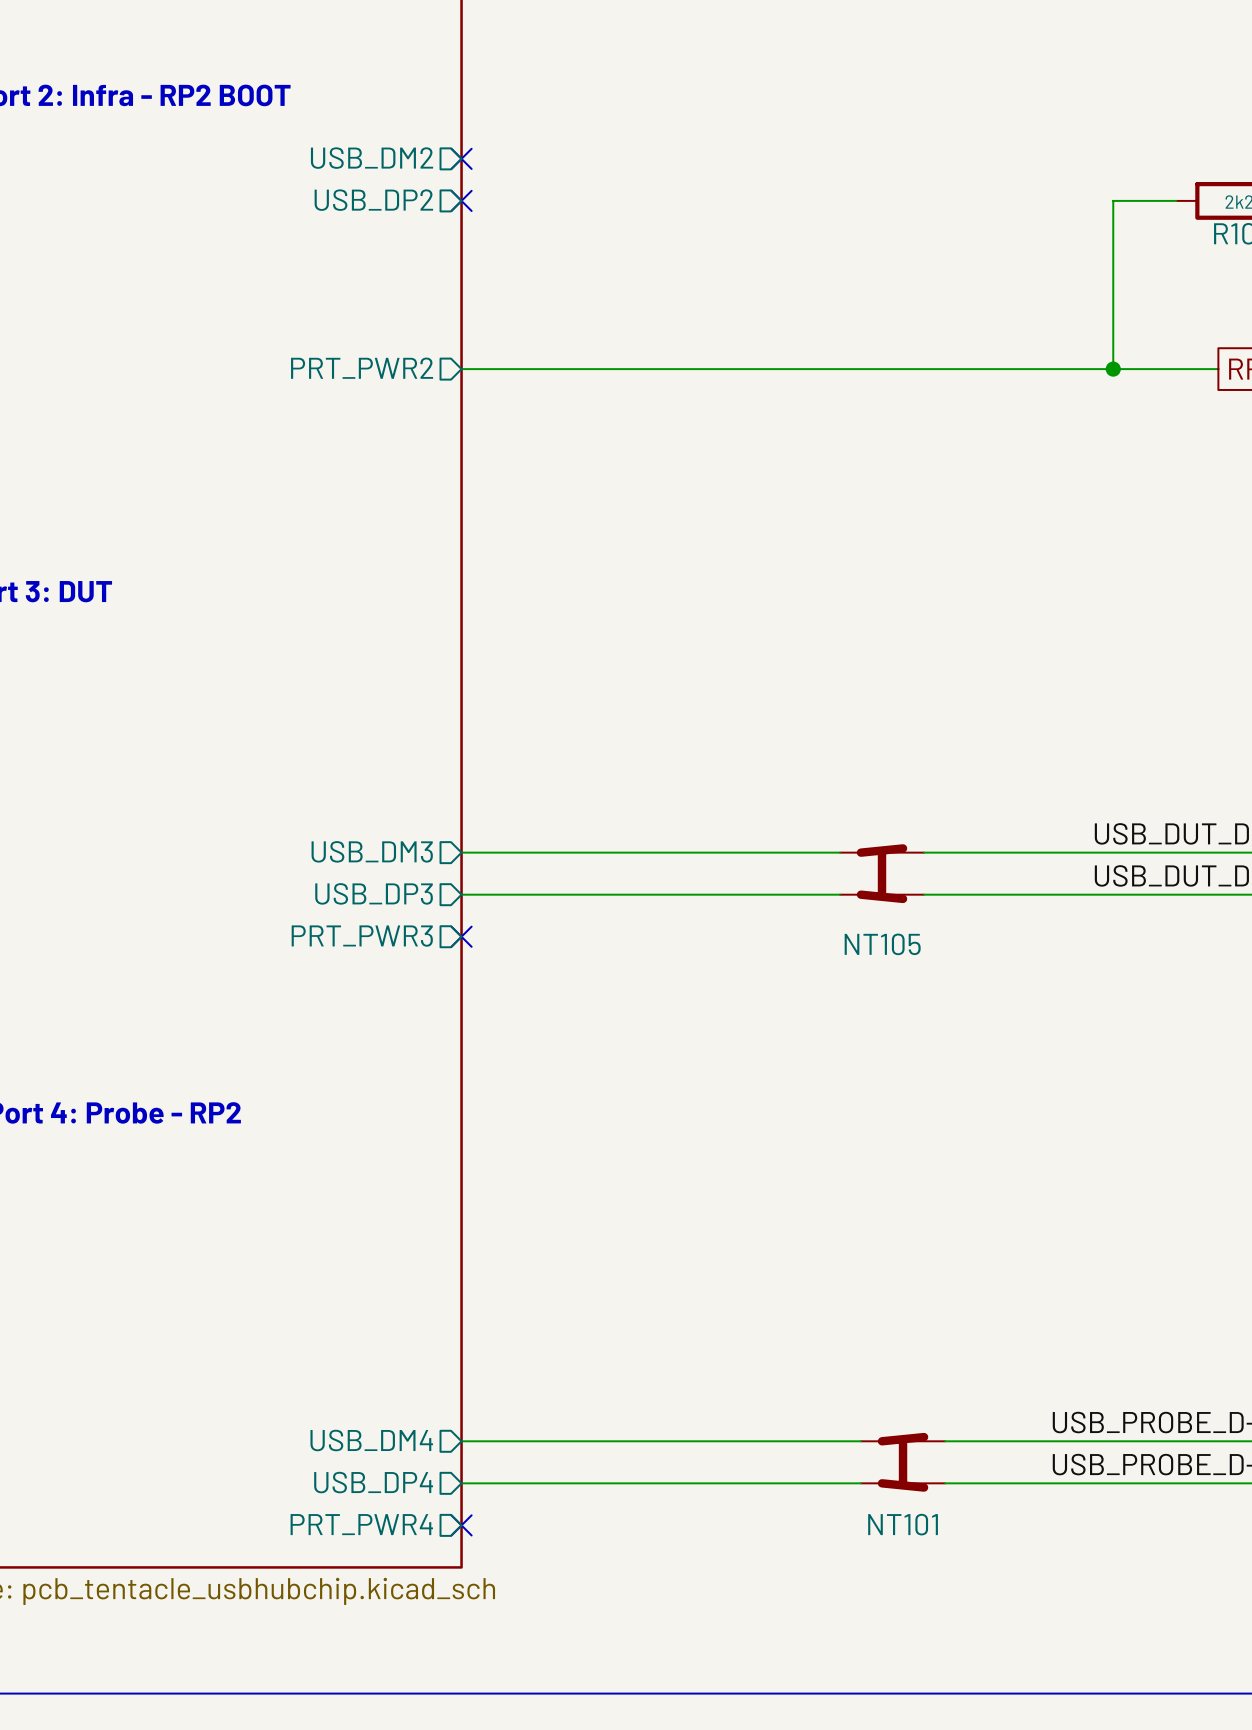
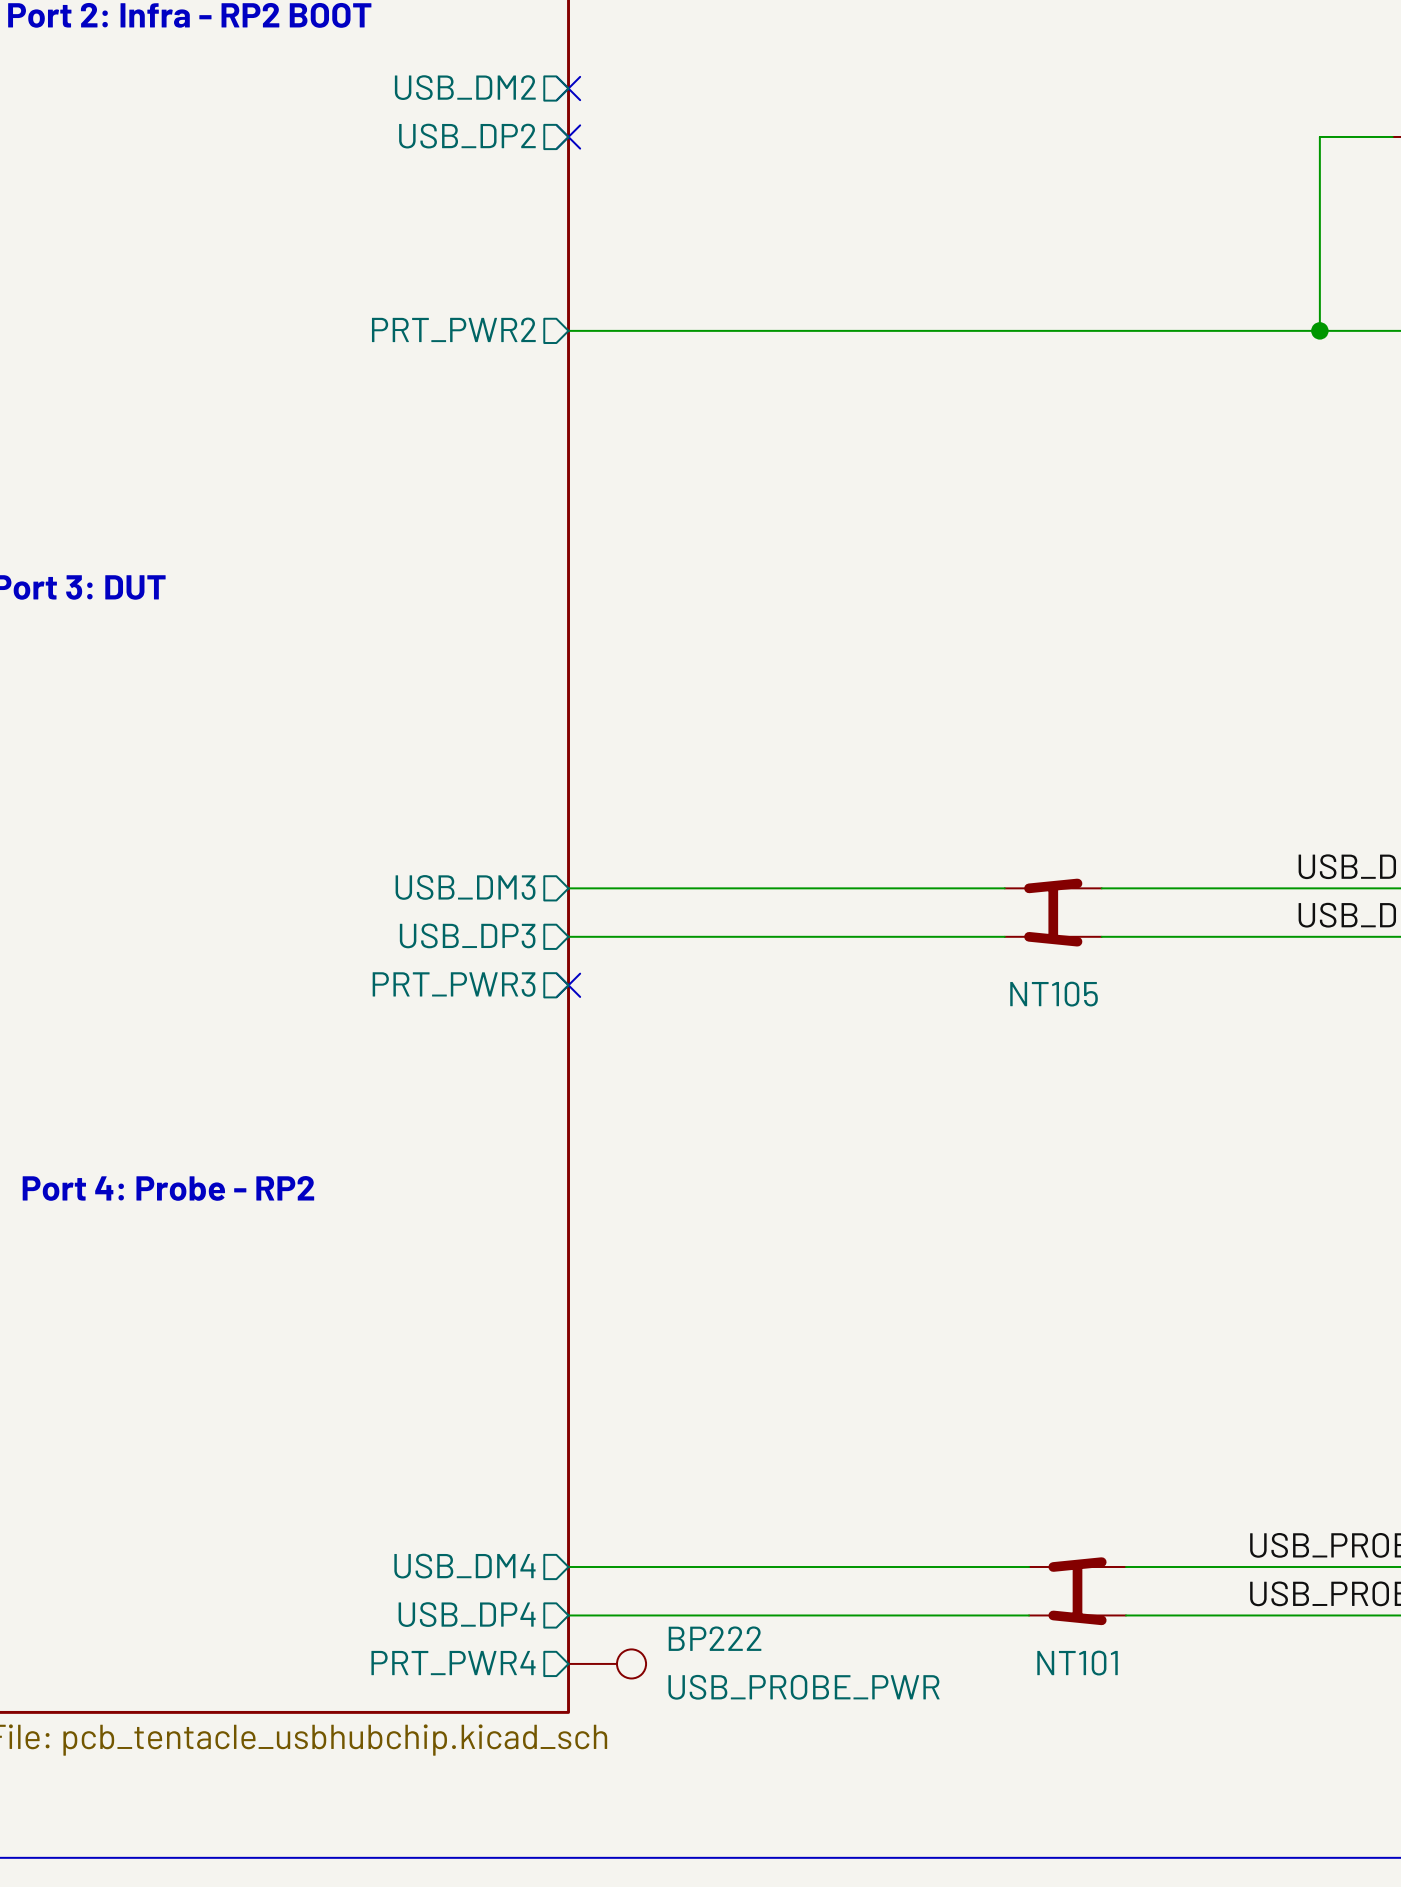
no-connect mark: (461, 1525) -> none
BP222: none -> USB_PROBE_PWR (607, 1663)

